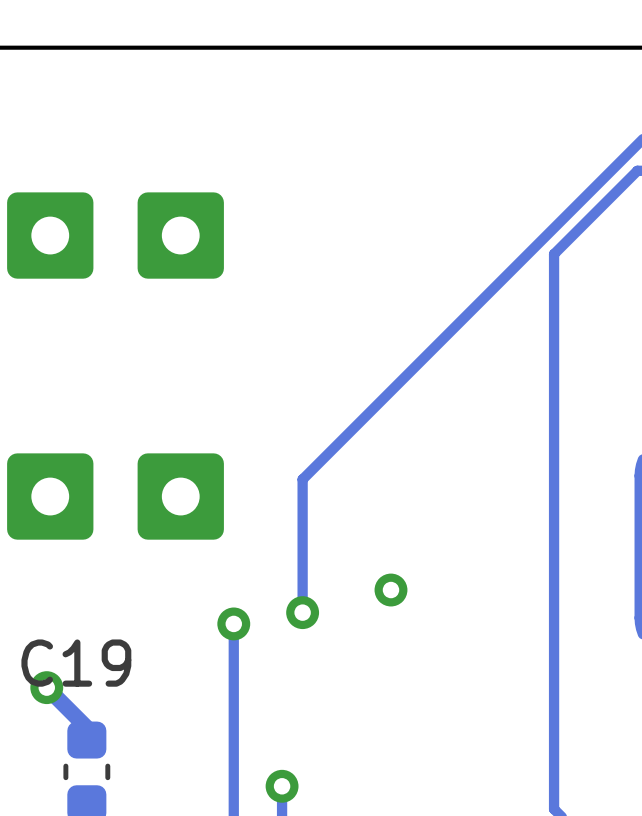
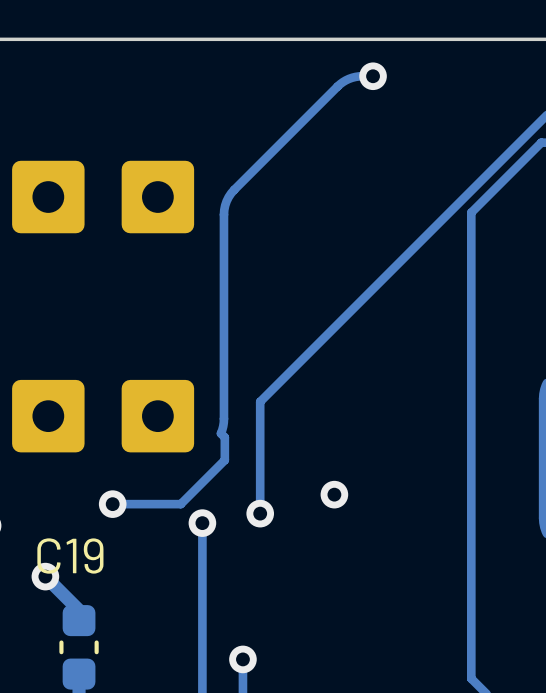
track: none -> (373, 76) (355, 76) (340, 84) (234, 189) (226, 201) (223, 214) (223, 418) (220, 433) (224, 437) (224, 460) (180, 504) (112, 504)
via: none -> (373, 76)
via: none -> (112, 504)

